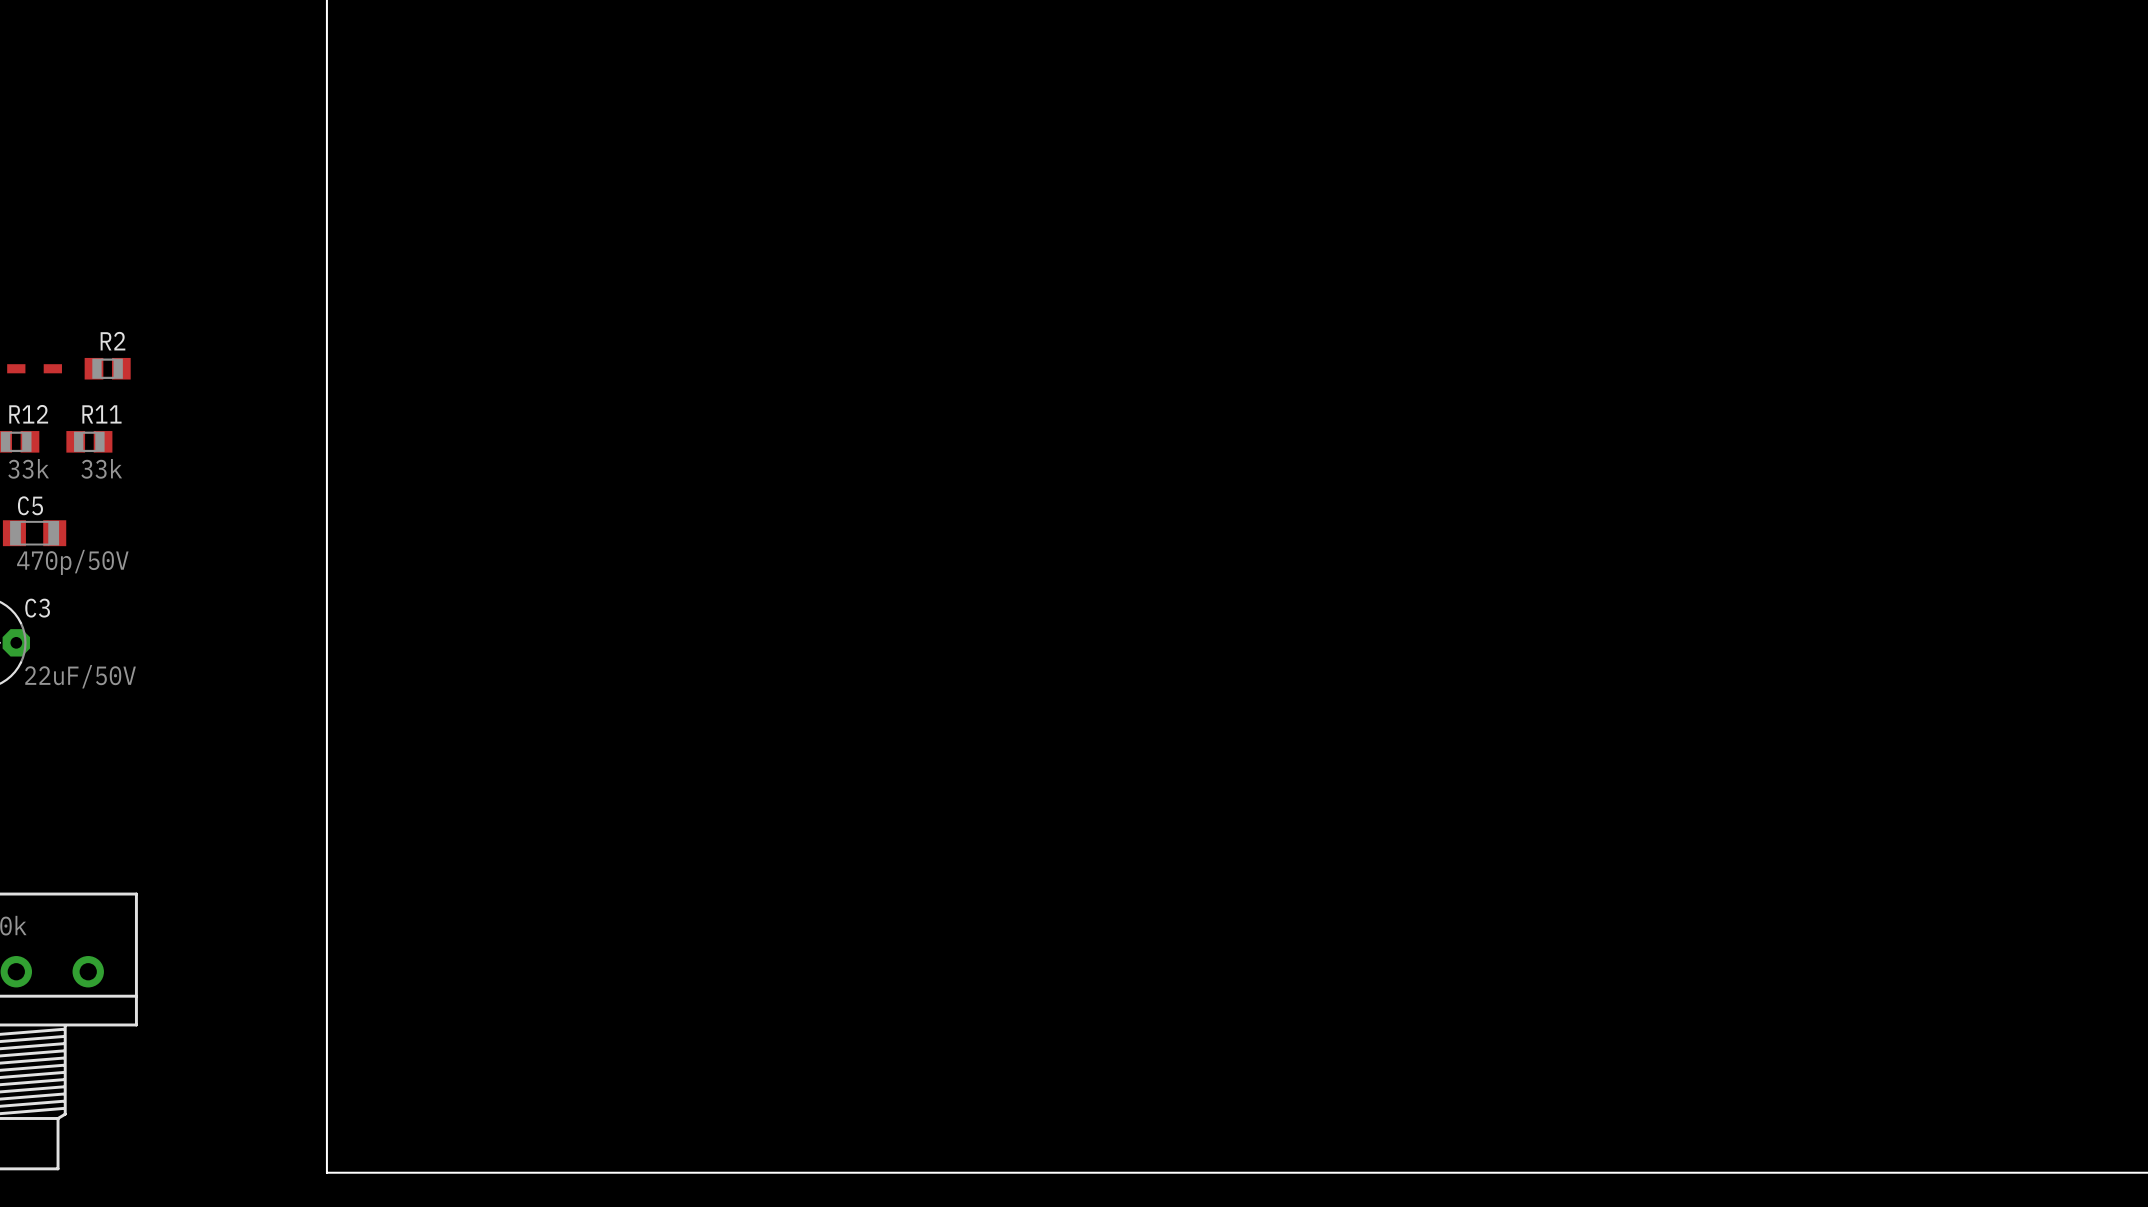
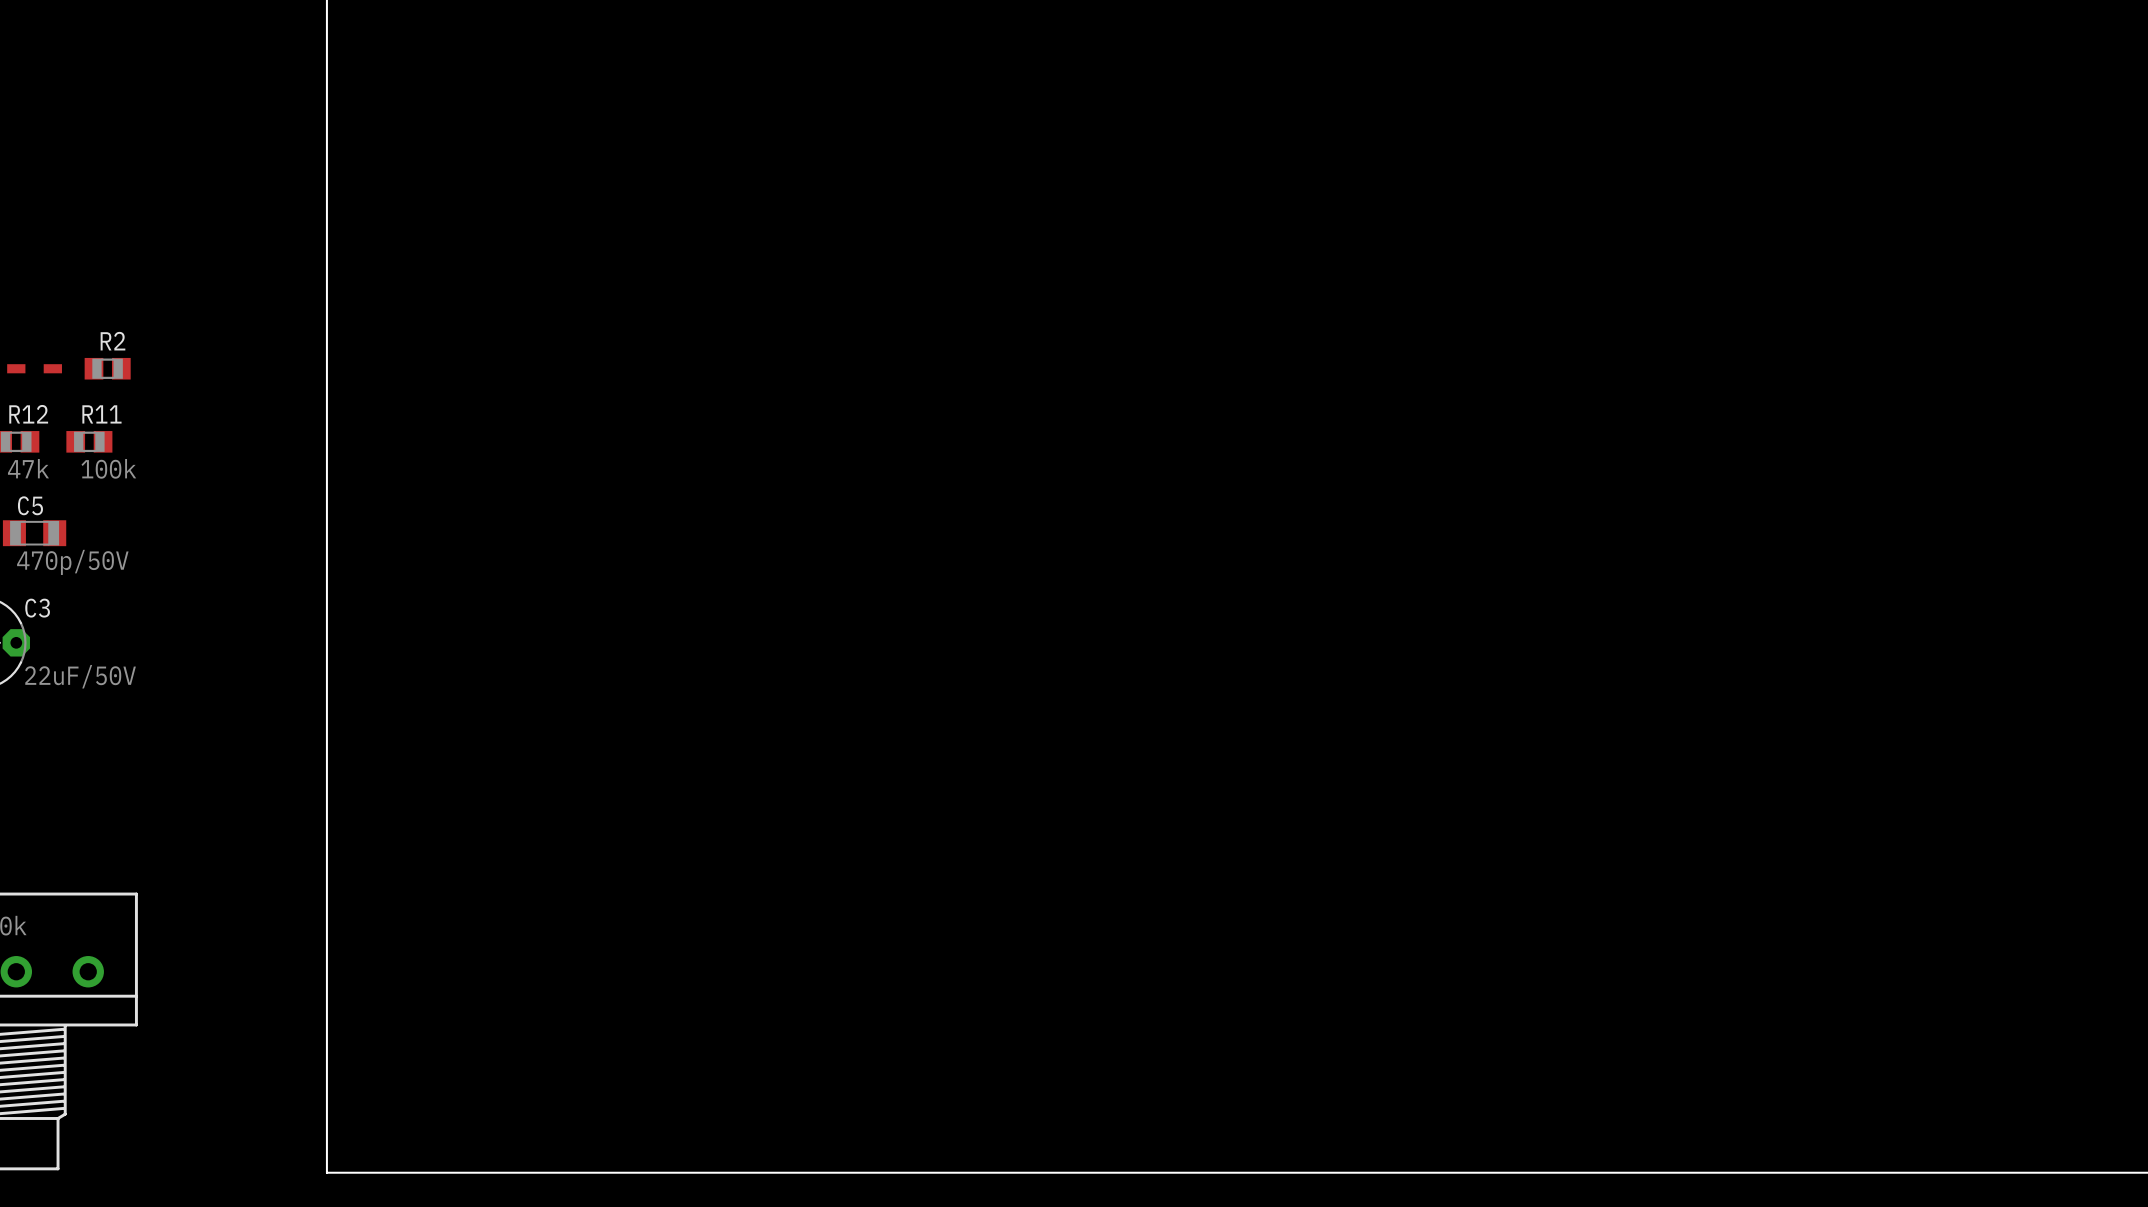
R12 value: 33k (28, 468) -> 47k (28, 468)
R11 value: 33k (101, 468) -> 100k (108, 468)

